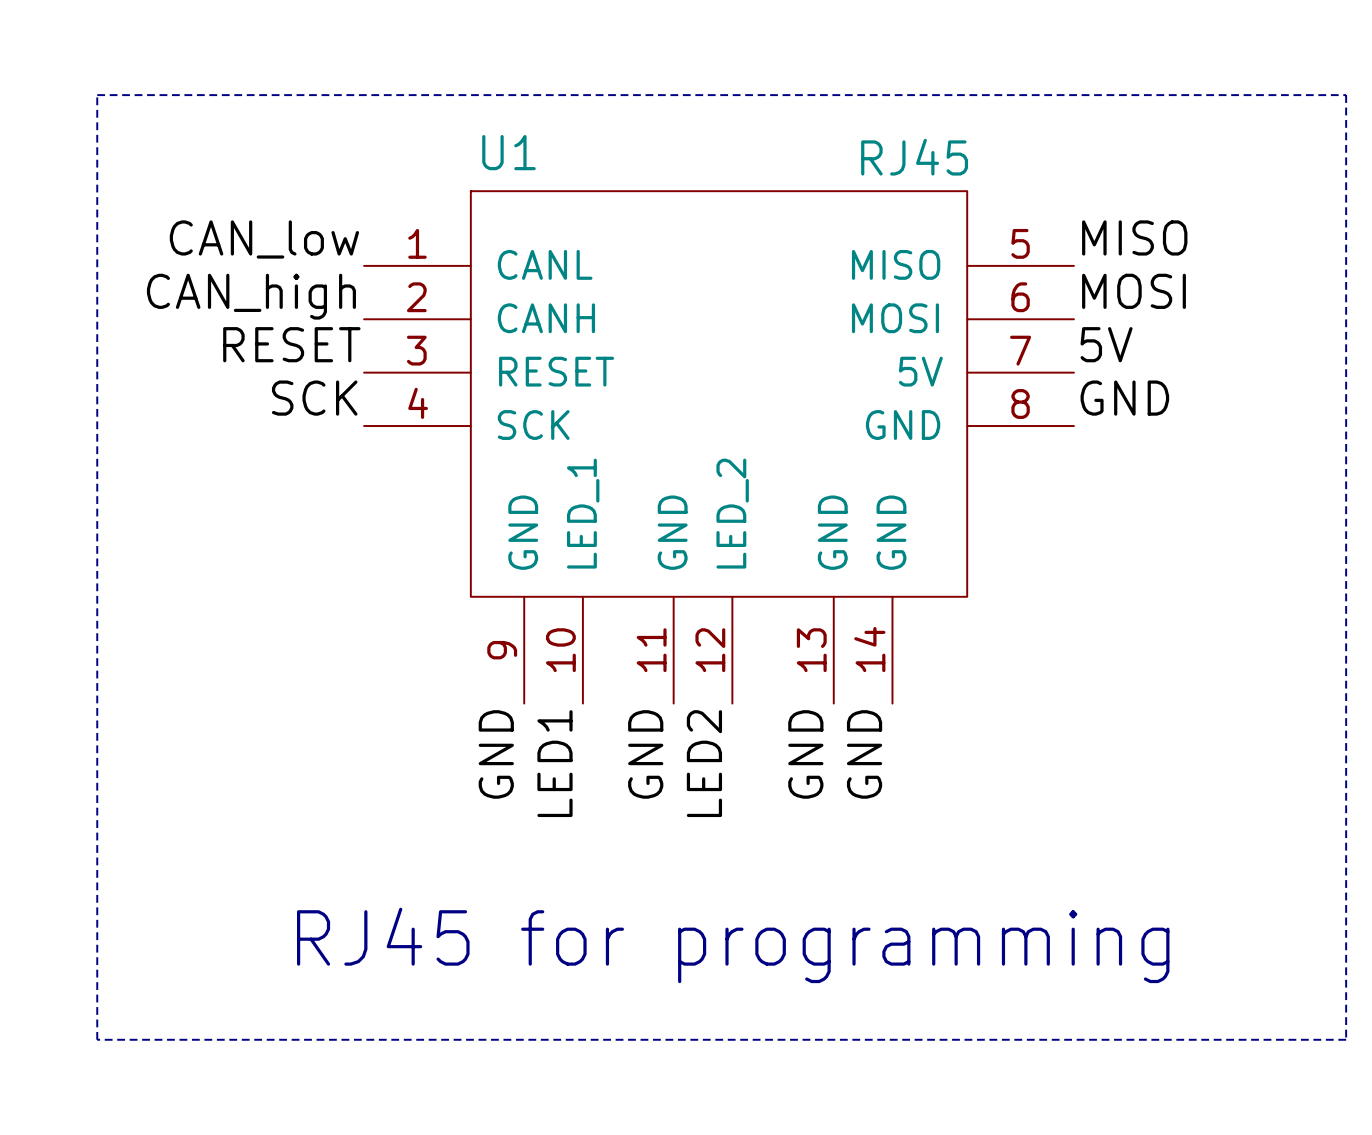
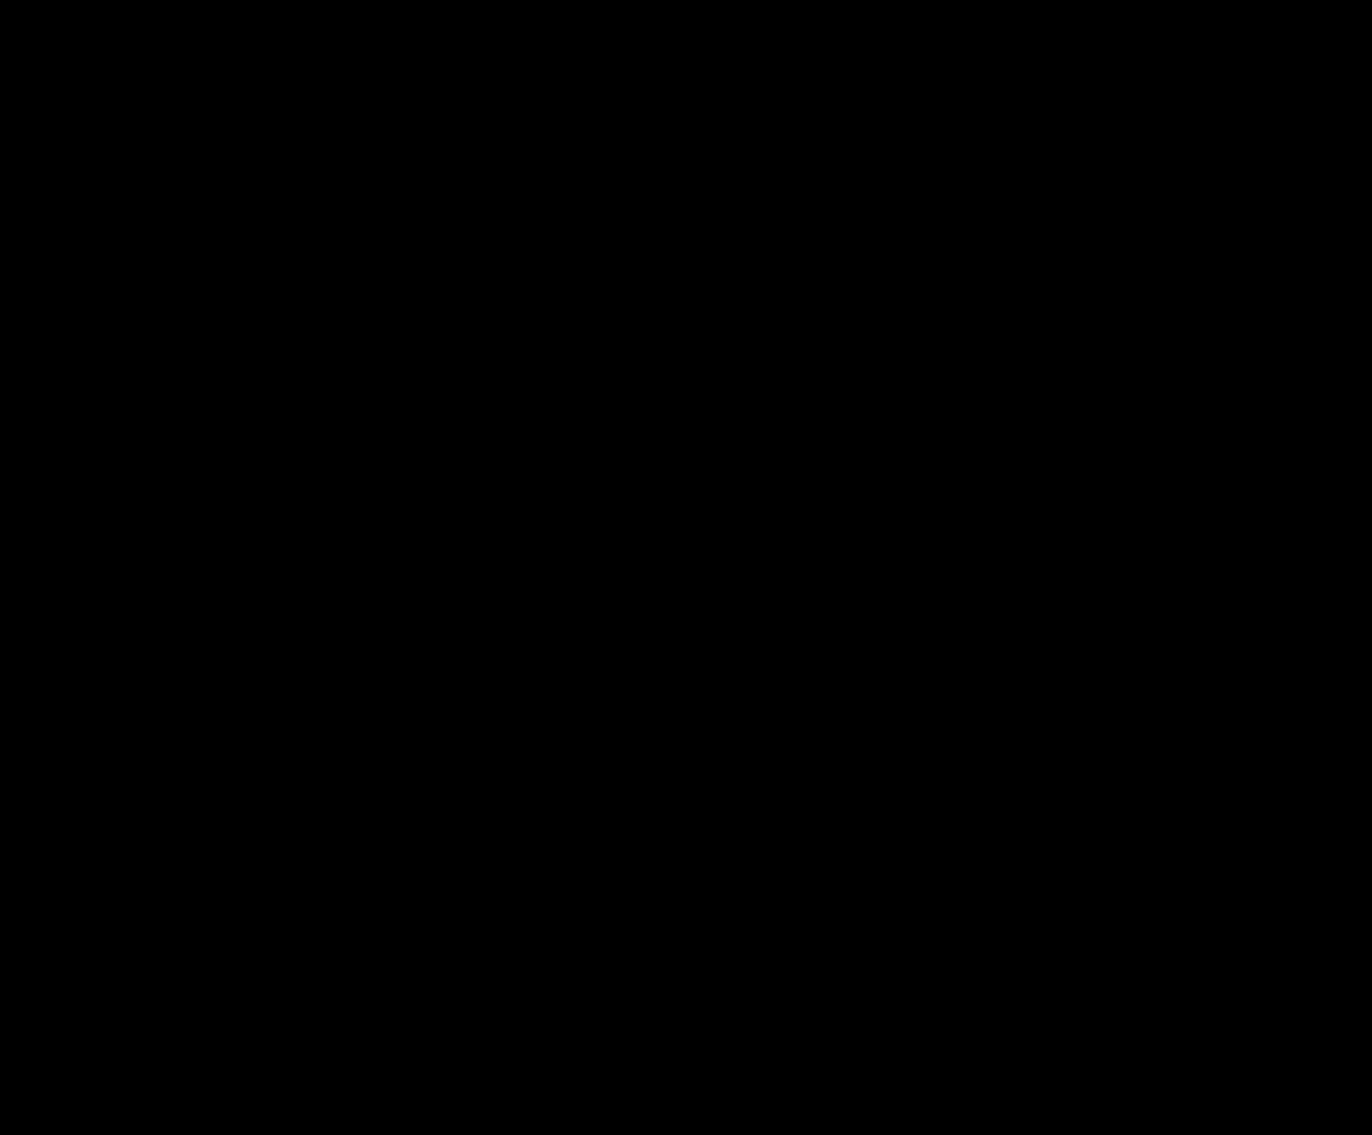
line: (97, 95) (1346, 95) (1346, 1039) (97, 1039) (97, 95) -> none
label: MISO (1134, 237) -> none
label: CAN_low (264, 239) -> none
label: MOSI (1134, 291) -> none
label: CAN_high (251, 296) -> none
label: RESET (291, 344) -> none
label: 5V (1106, 344) -> none
label: SCK (314, 398) -> none
label: GND (1124, 398) -> none
U1: RJ45 (719, 447) -> none
label: GND (496, 754) -> none
label: GND (645, 754) -> none
label: GND (805, 754) -> none
label: GND (864, 754) -> none
label: LED1 (554, 763) -> none
label: LED2 (704, 763) -> none
text: RJ45 for programming (733, 945) -> none

